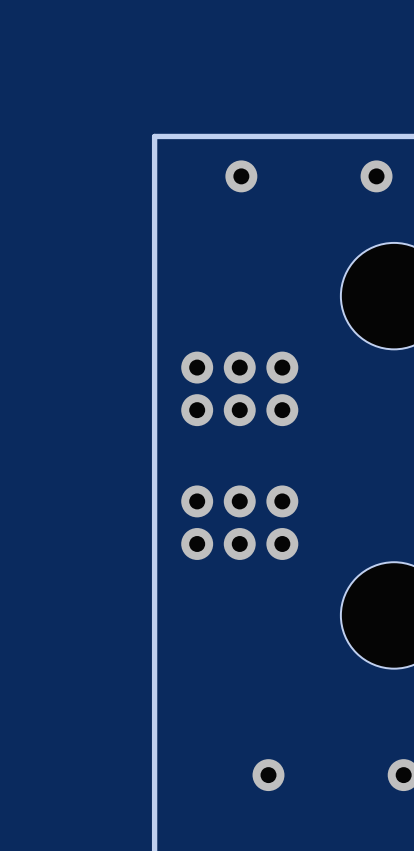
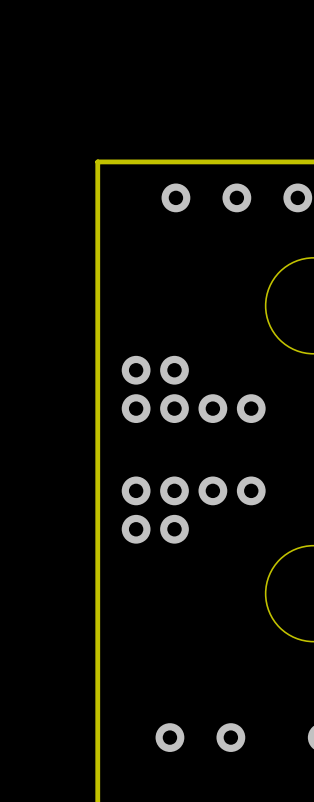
via: none -> (236, 197)
via position: (282, 367) -> (251, 408)
via position: (282, 544) -> (251, 490)
via: none -> (169, 737)
via: (268, 775) -> none
via: none -> (230, 737)

